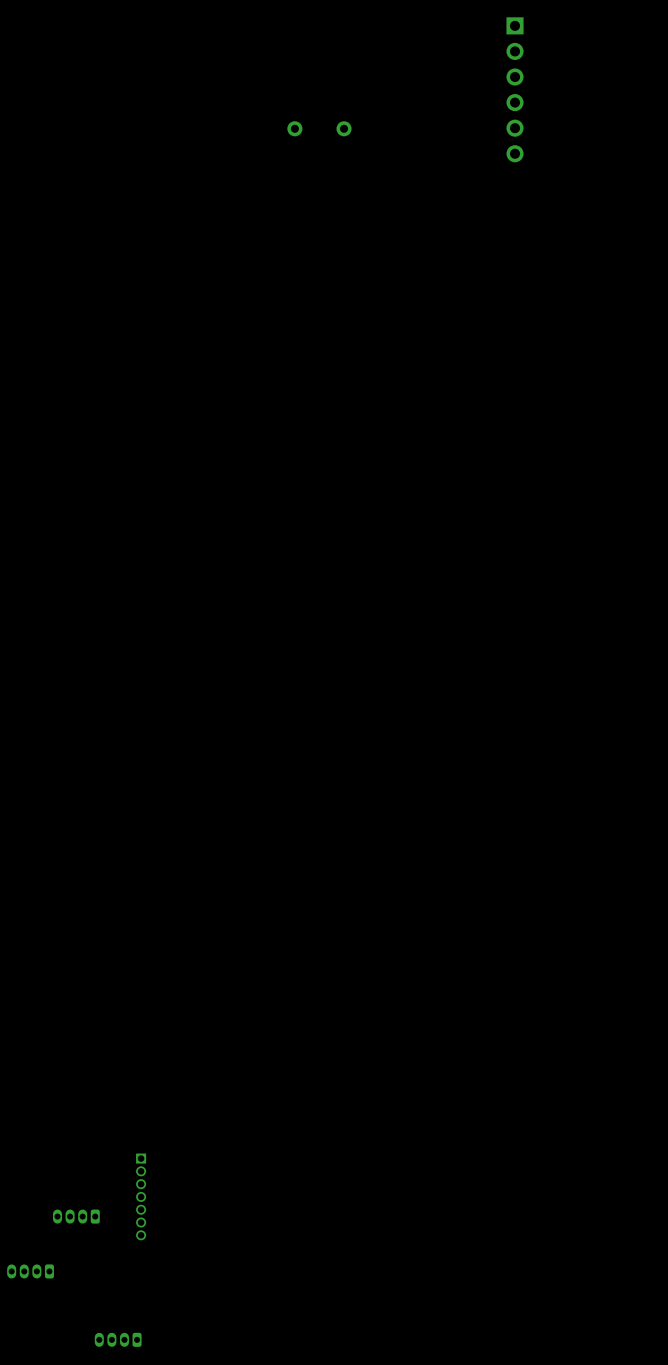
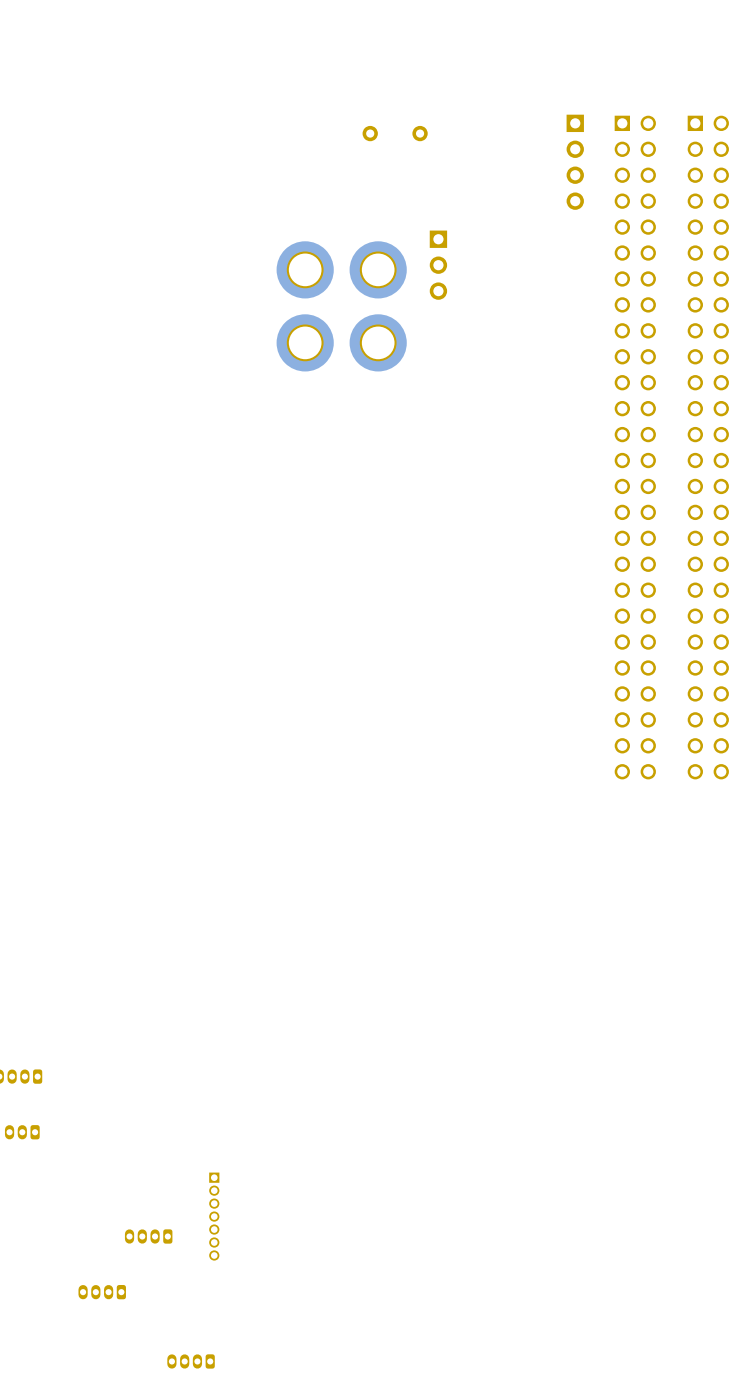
part: (515, 89) -> none
part: none -> (575, 162)
part: none -> (438, 265)
part: none -> (305, 269)
part: none -> (378, 269)
part: none -> (305, 342)
part: none -> (378, 342)
part: none -> (635, 447)
part: none -> (708, 447)

